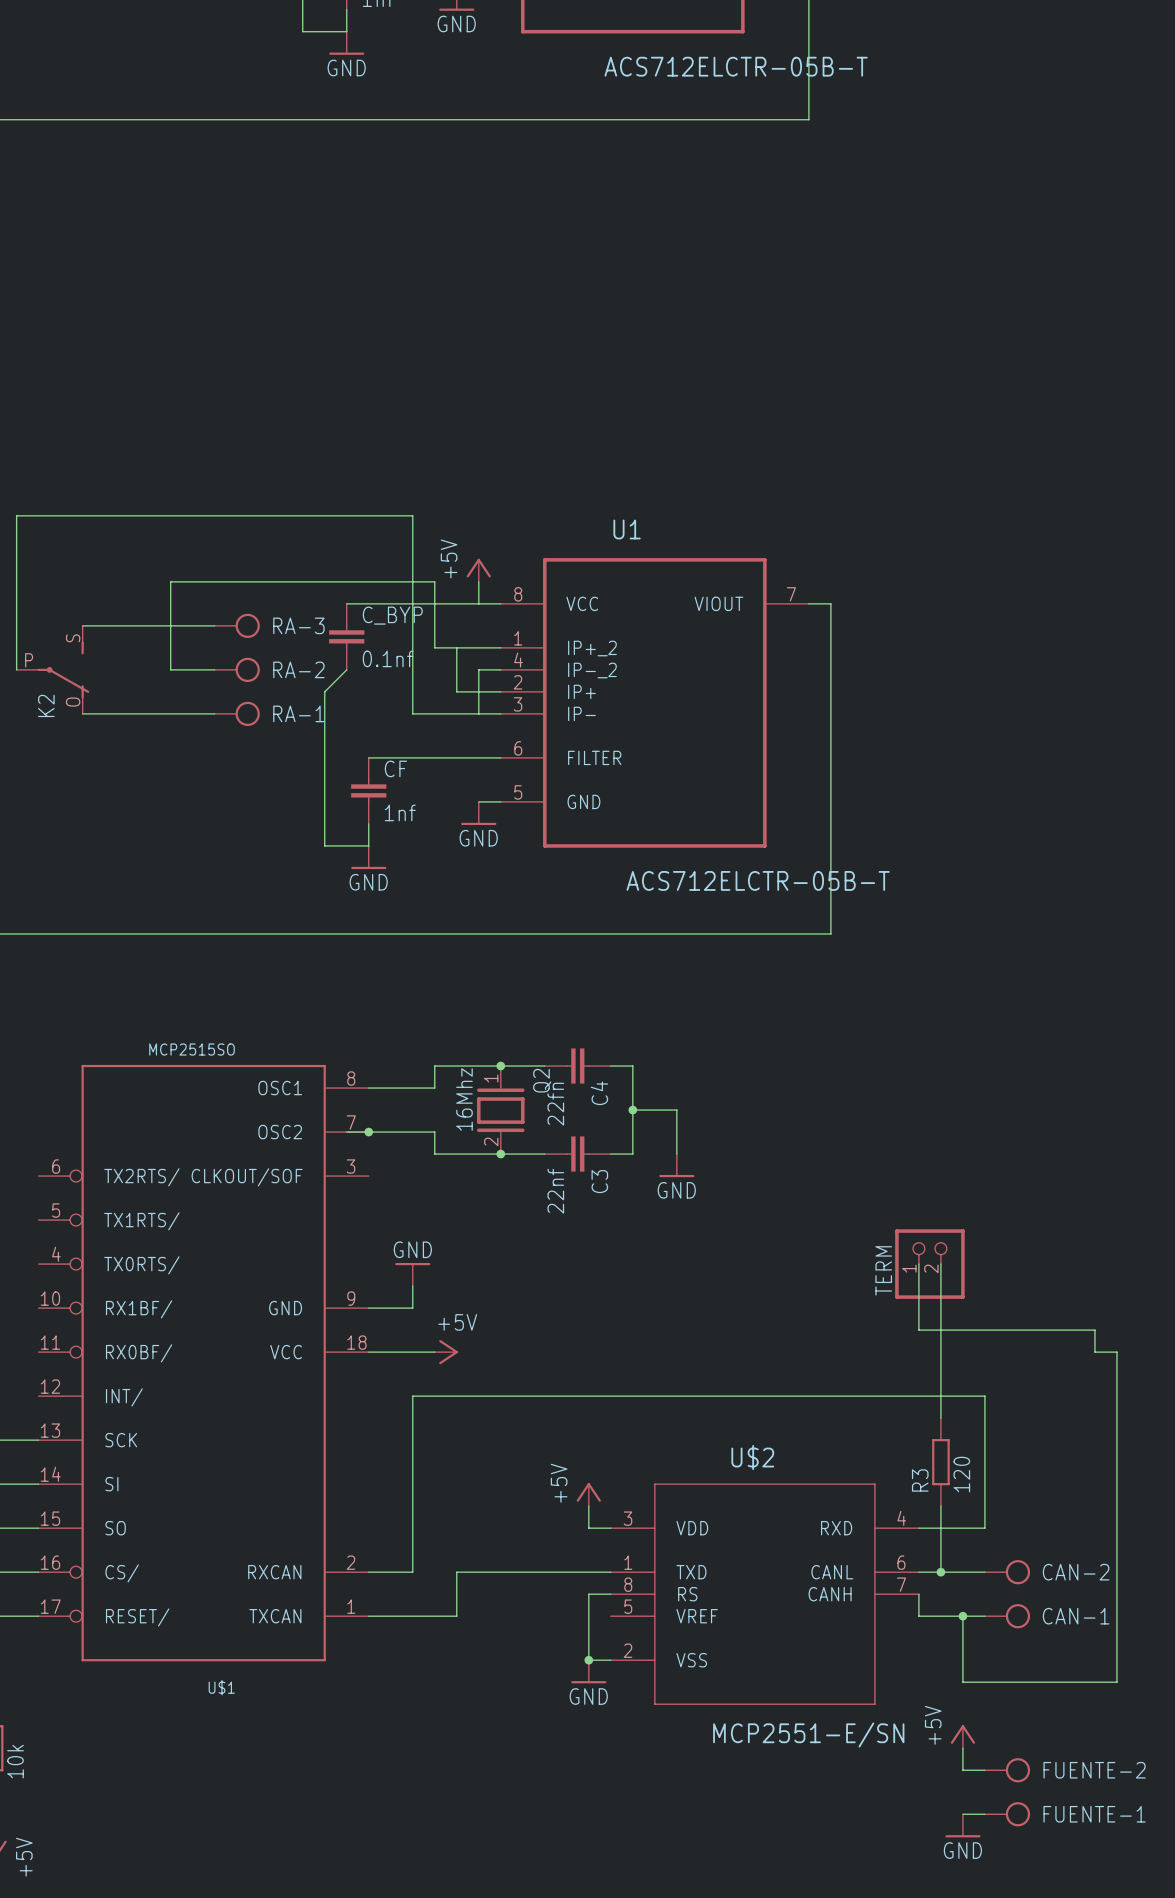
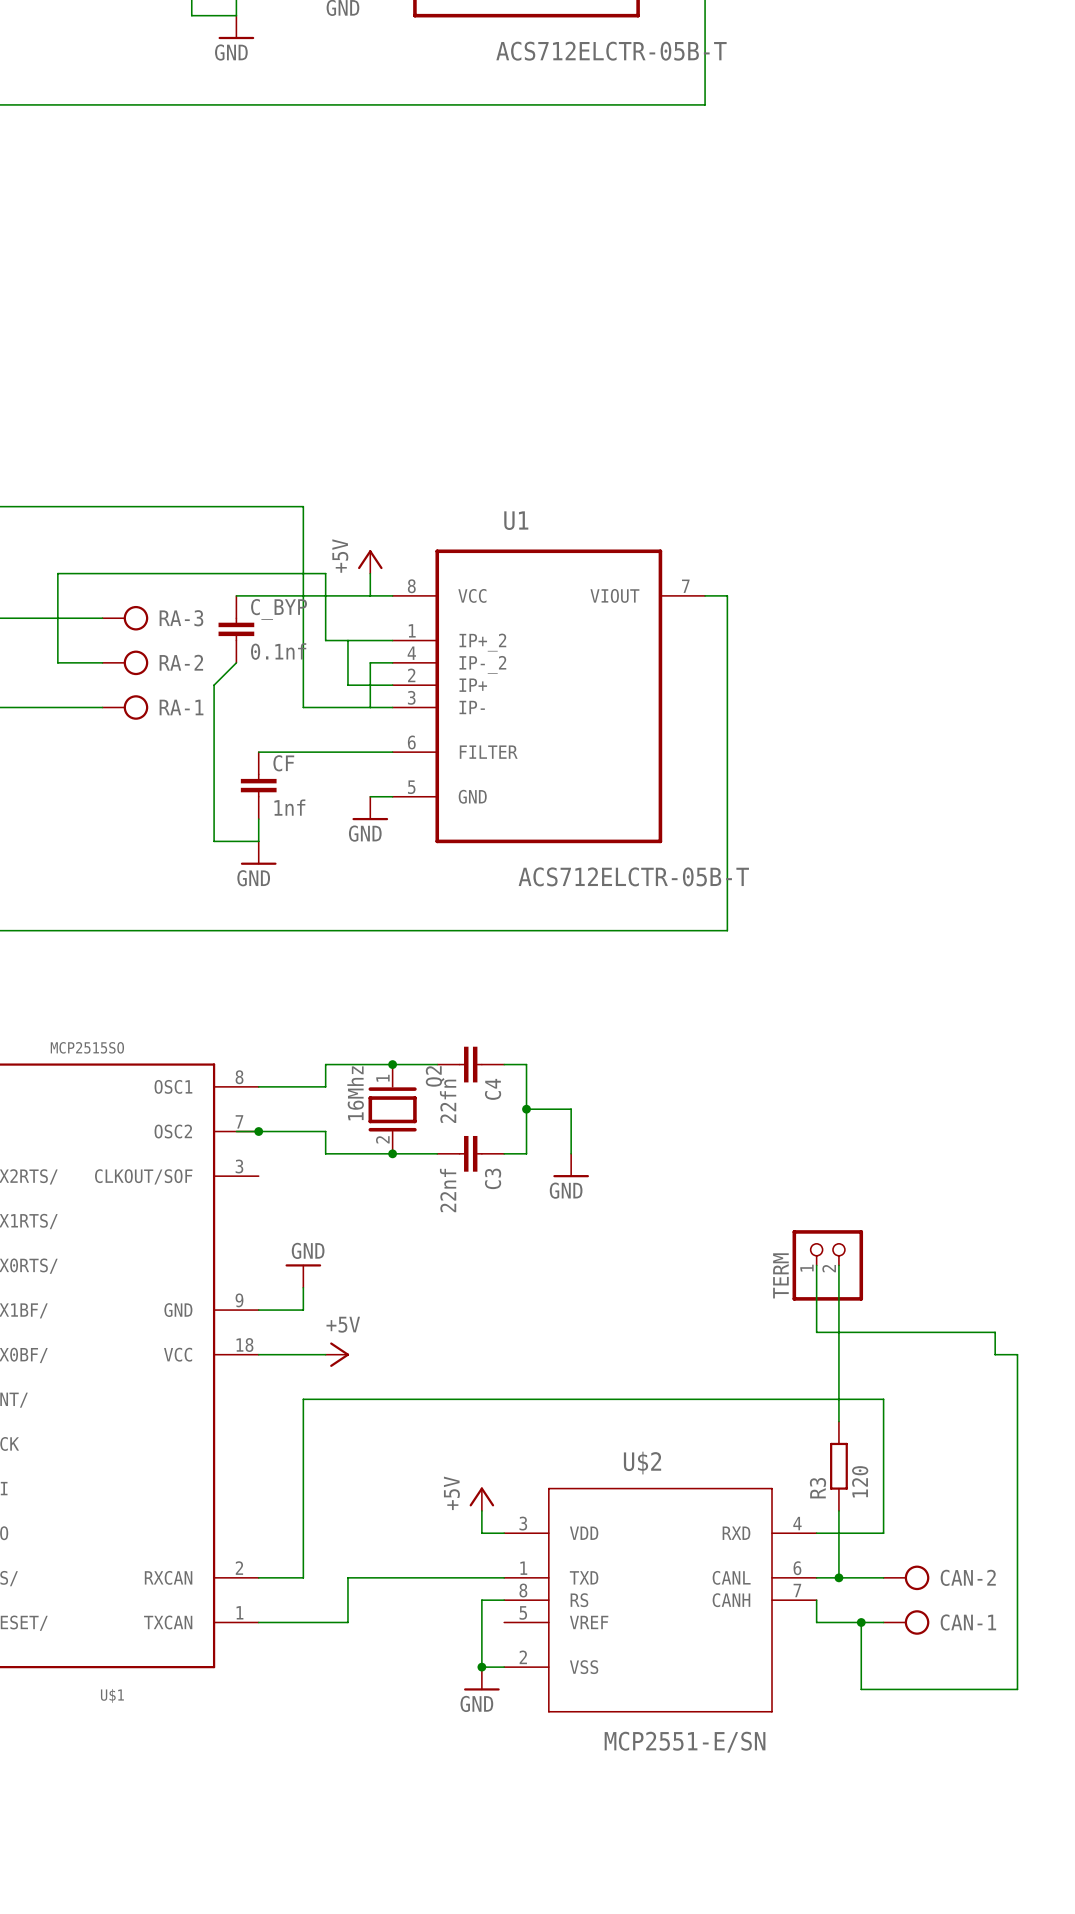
power symbol: +5V (962, 1736) -> none
wire: (962, 1748) (962, 1770) (984, 1770) -> none
FUENTE-2: (1007, 1770) -> none
wire: (962, 1814) (984, 1814) -> none
FUENTE-1: (1007, 1814) -> none
power symbol: GND (962, 1825) -> none

